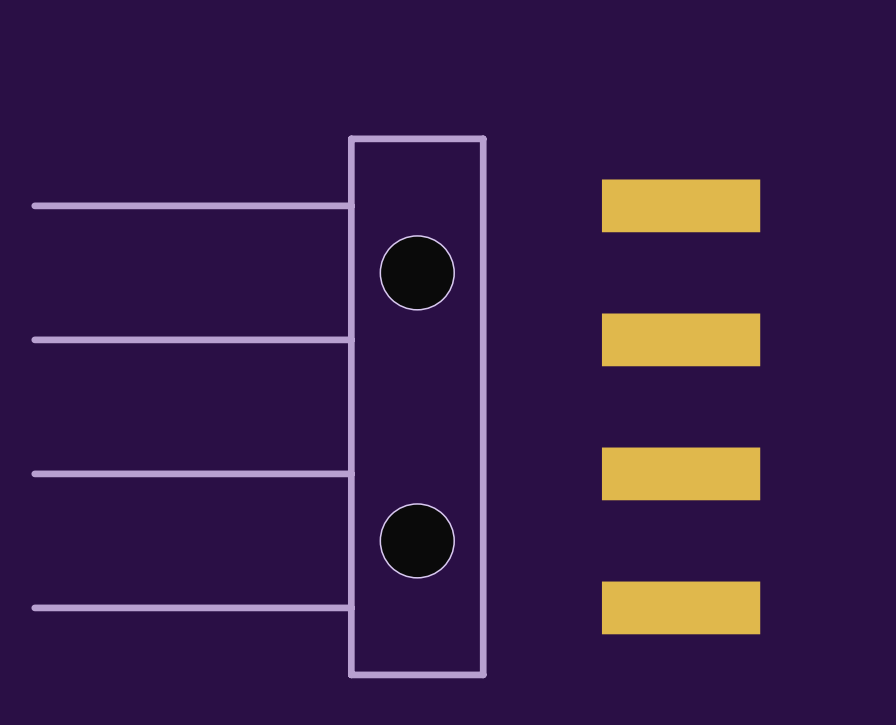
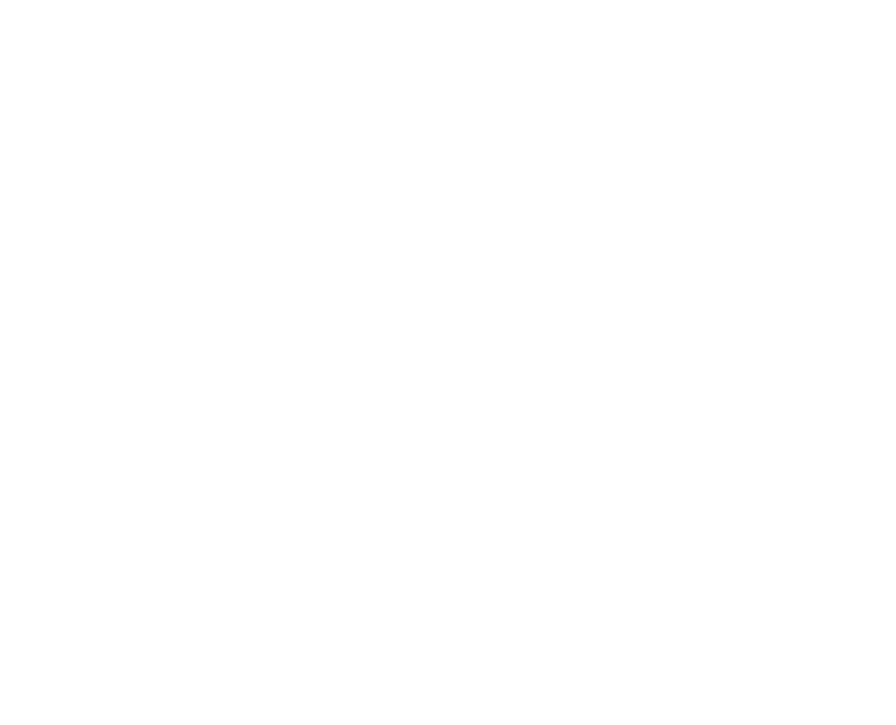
part: (395, 406) -> none

